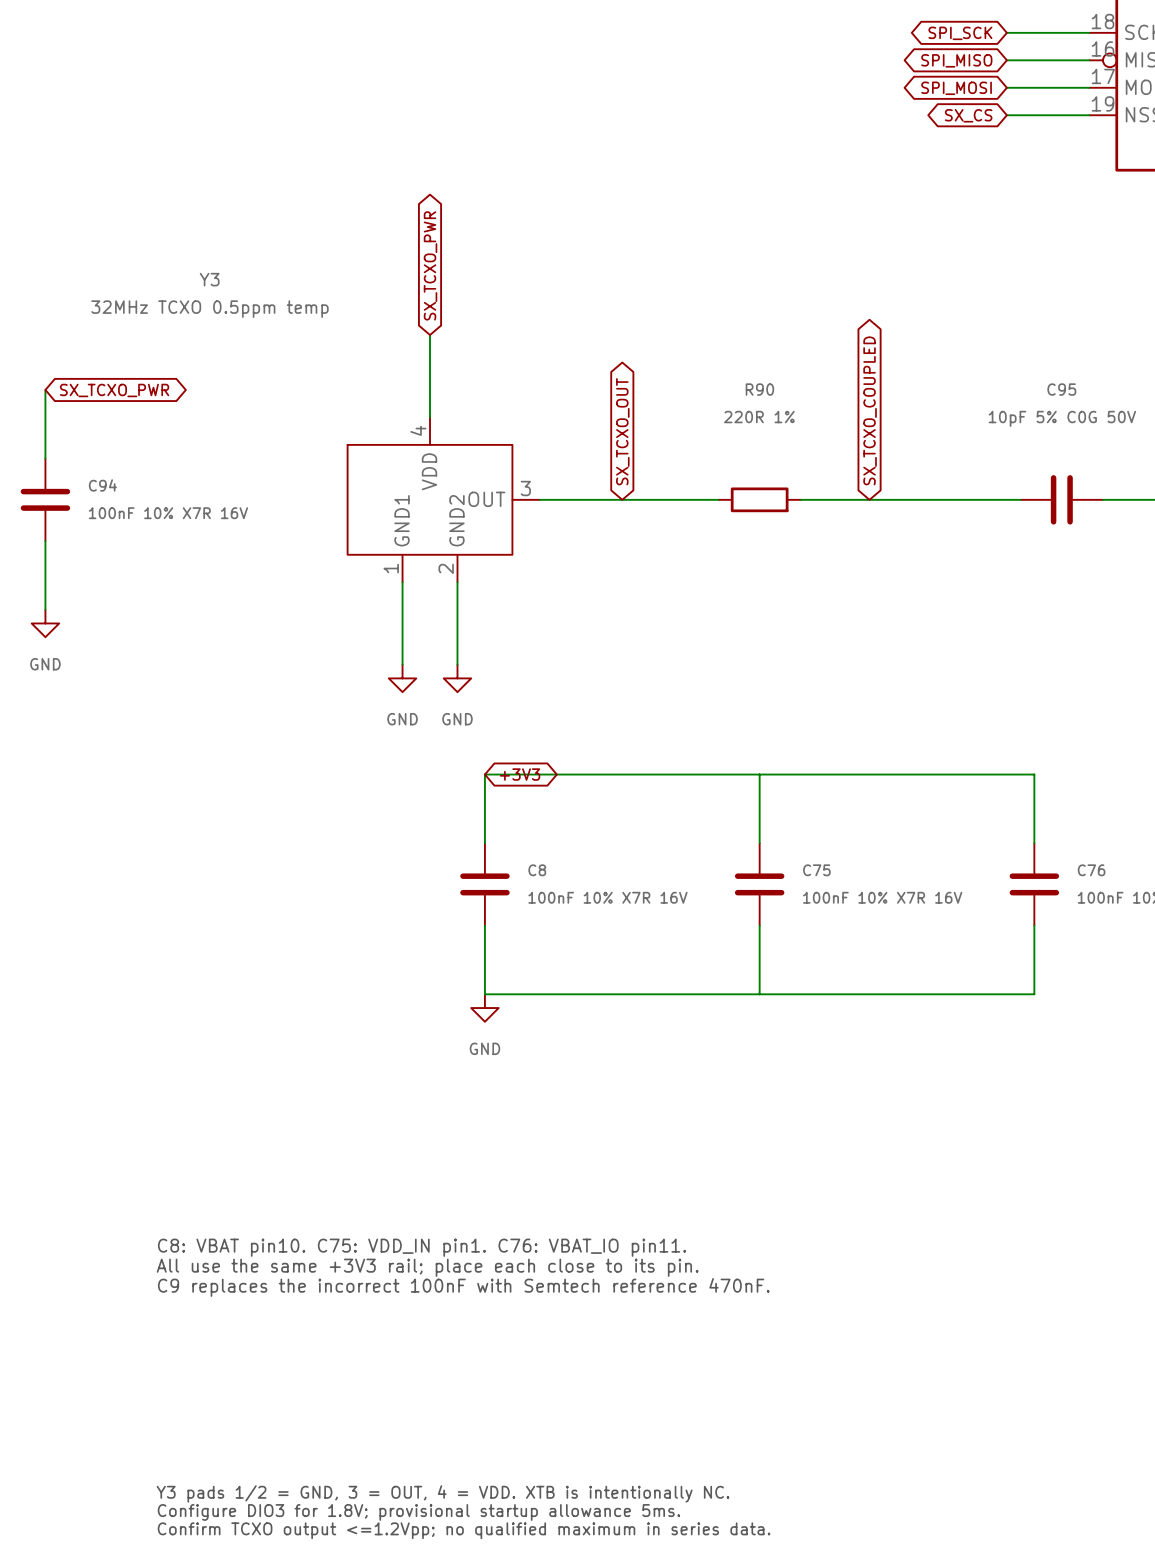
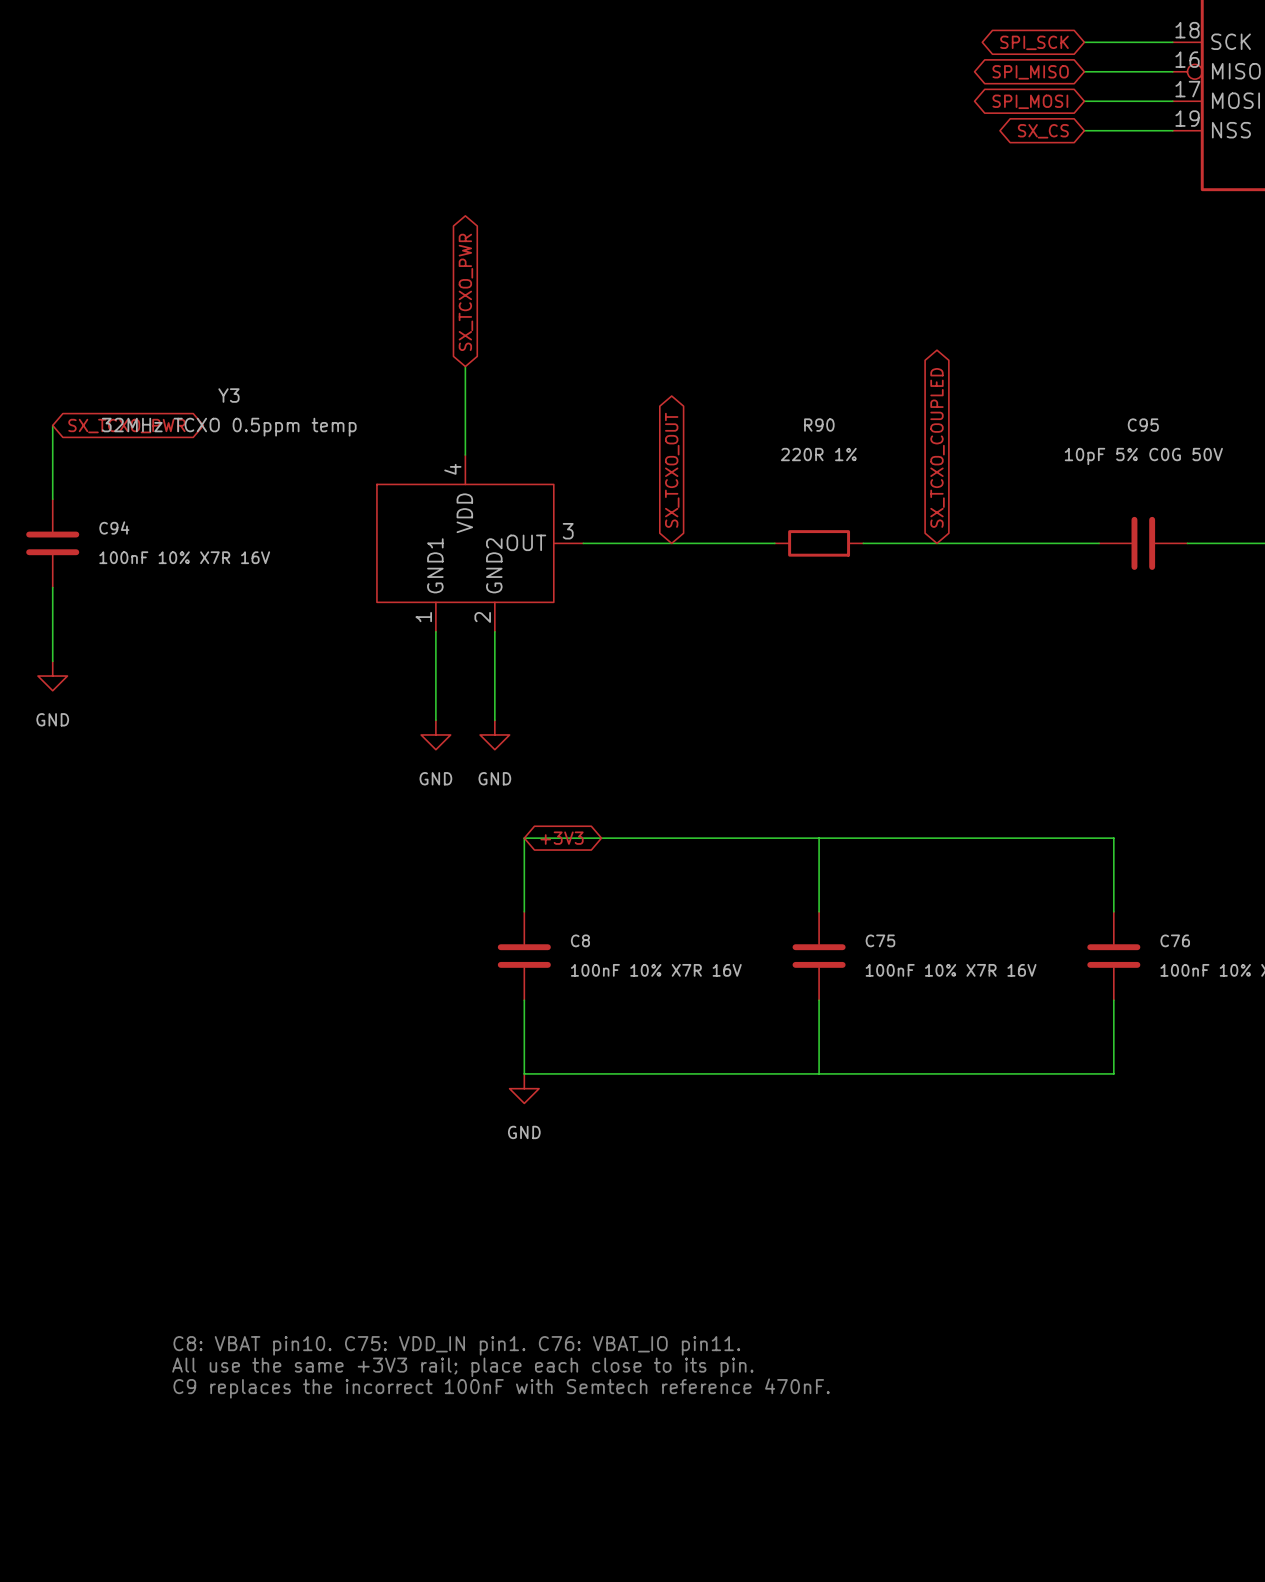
Y3 name position: Y3 (209, 279) -> Y3 (228, 395)
Y3 value position: 32MHz TCXO 0.5ppm temp (209, 309) -> 32MHz TCXO 0.5ppm temp (229, 427)

